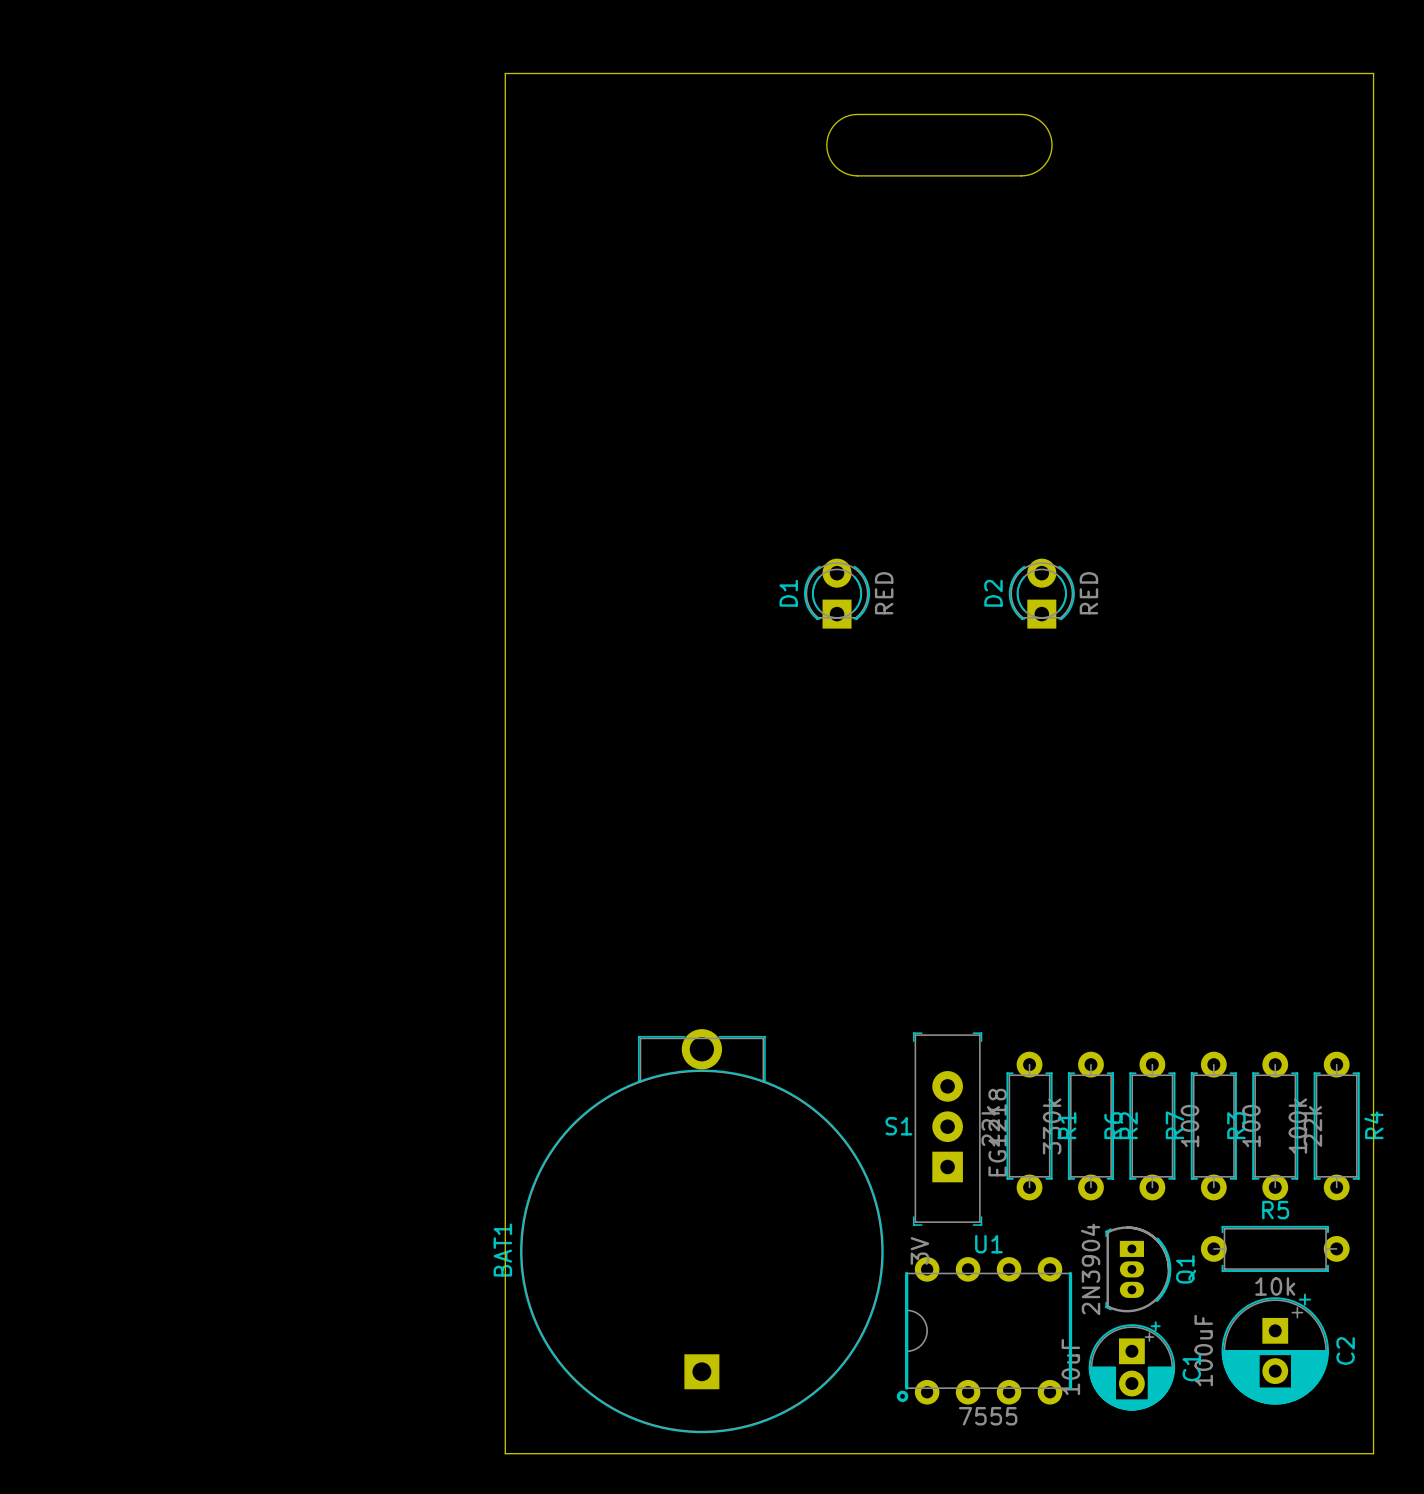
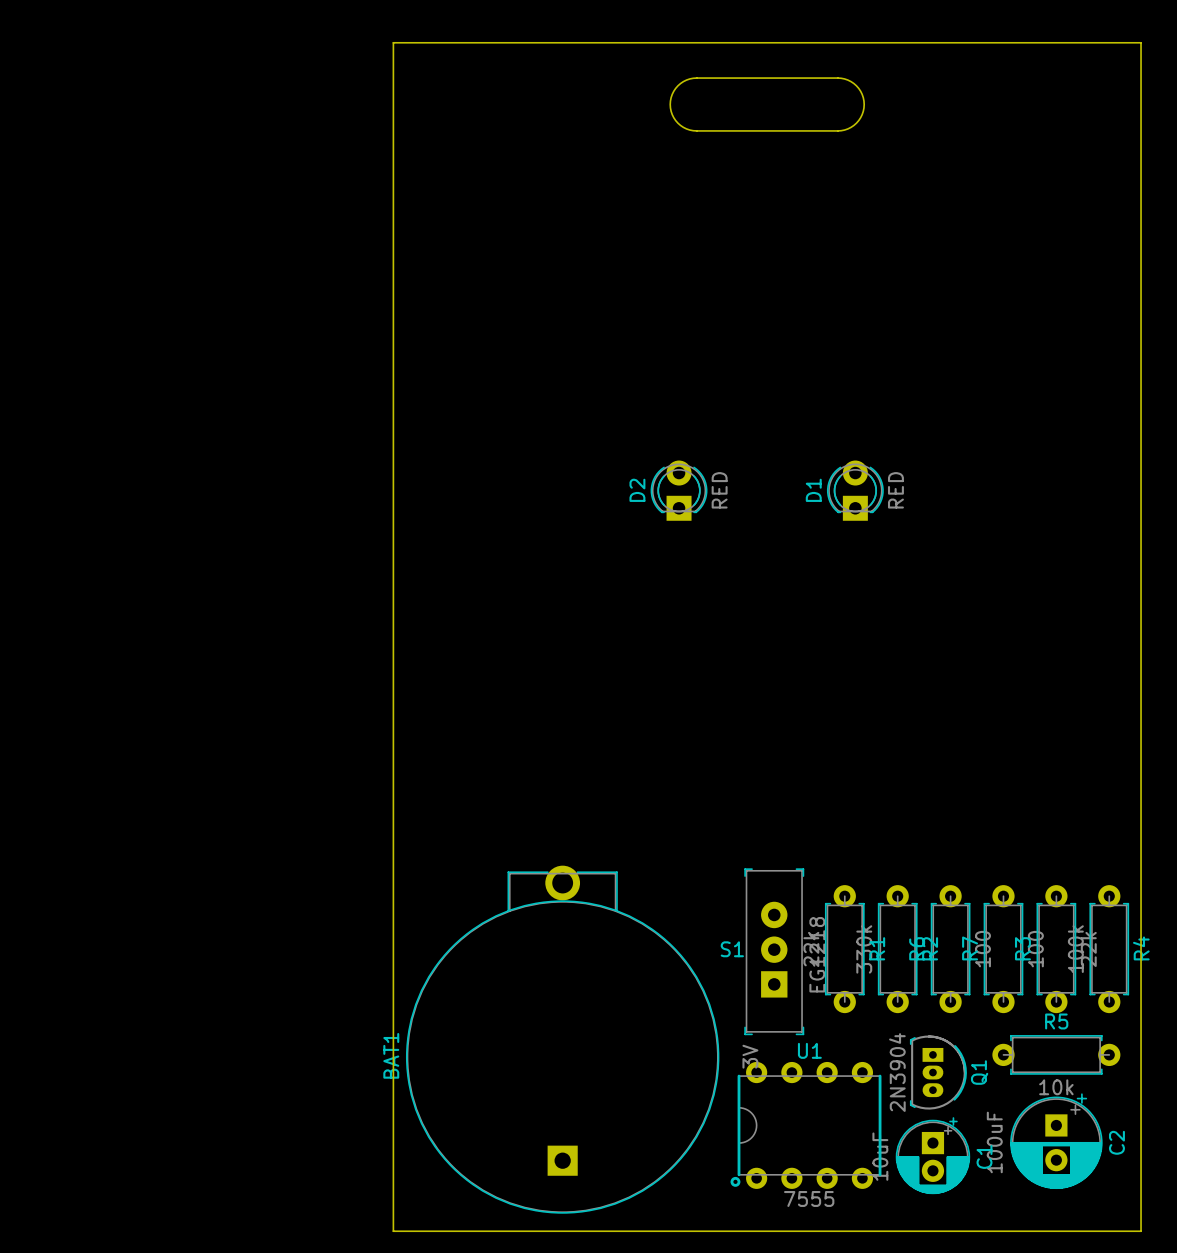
D1 name: D1 (788, 593) -> D2 (637, 490)
D2 name: D2 (993, 593) -> D1 (813, 490)

